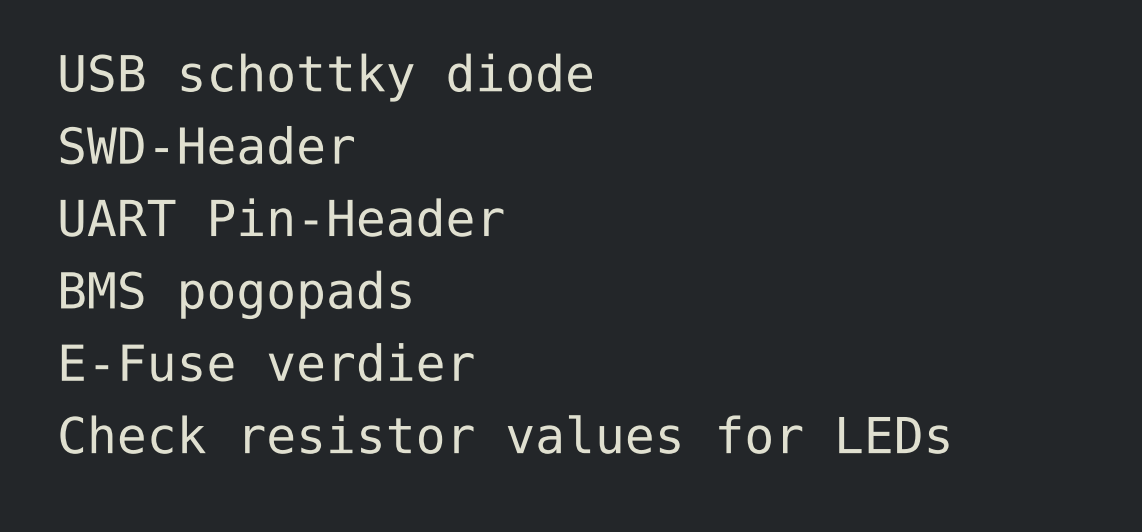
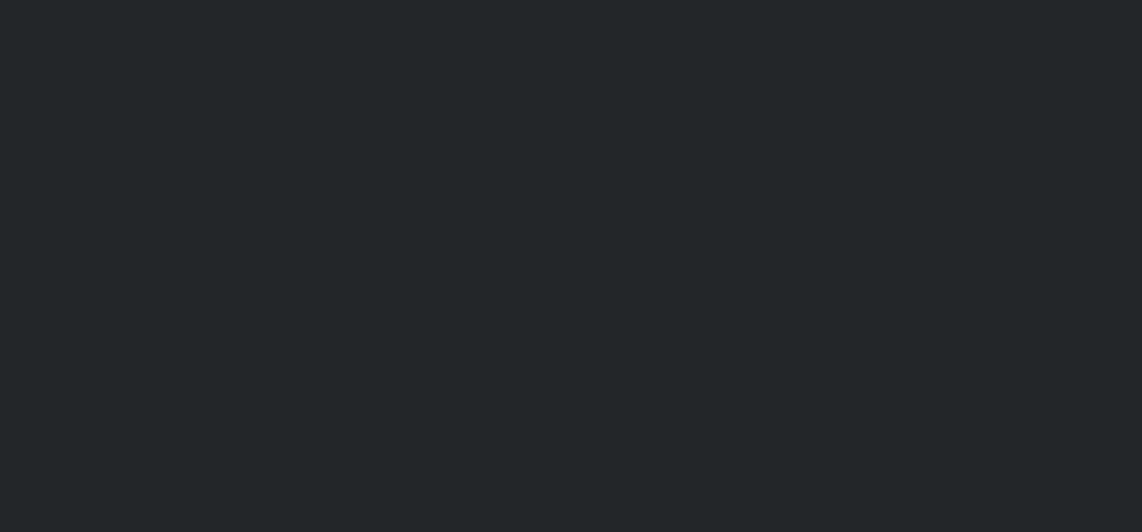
label: USB schottky diode (326, 77) -> none
label: SWD-Header (207, 145) -> none
label: UART Pin-Header (282, 217) -> none
label: BMS pogopads (235, 294) -> none
label: E-Fuse verdier (267, 362) -> none
label: Check resistor values for LEDs (504, 434) -> none

